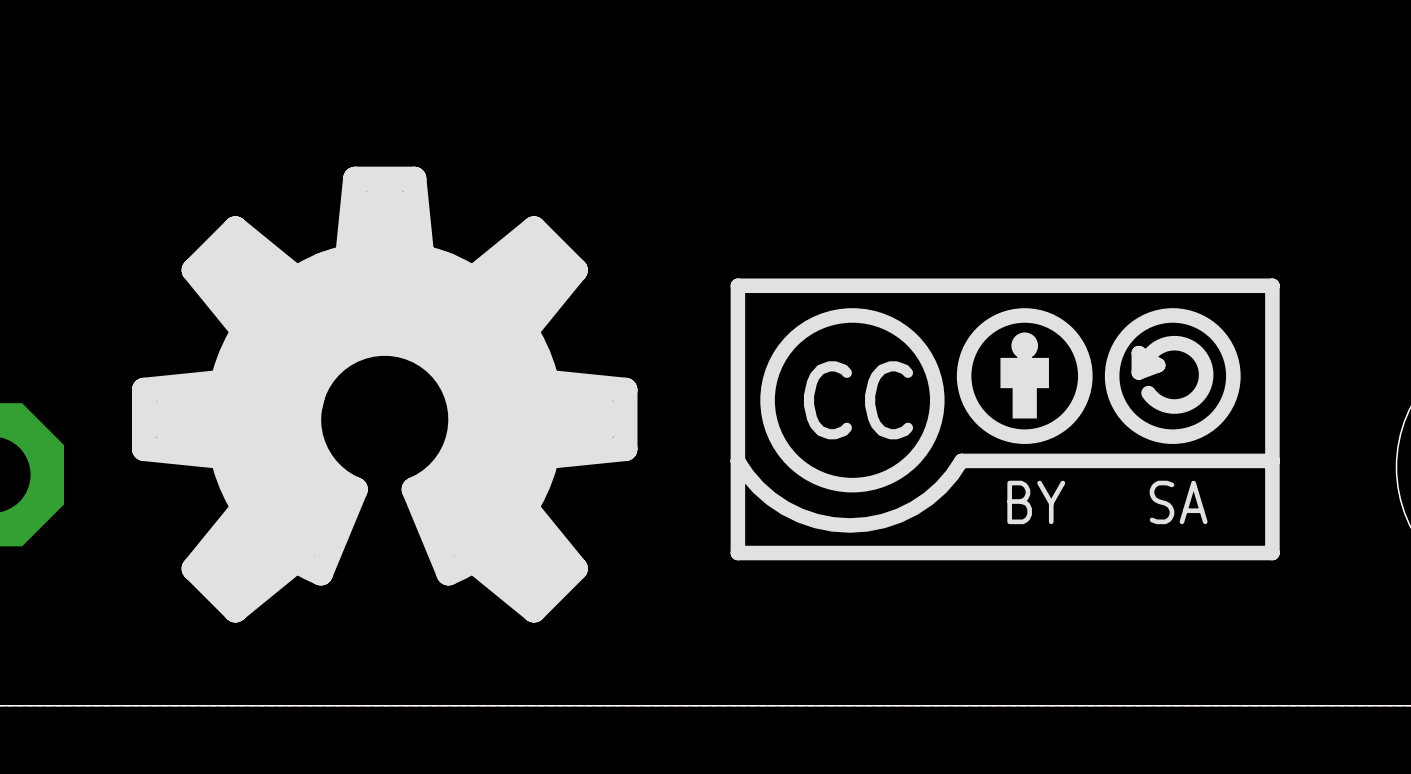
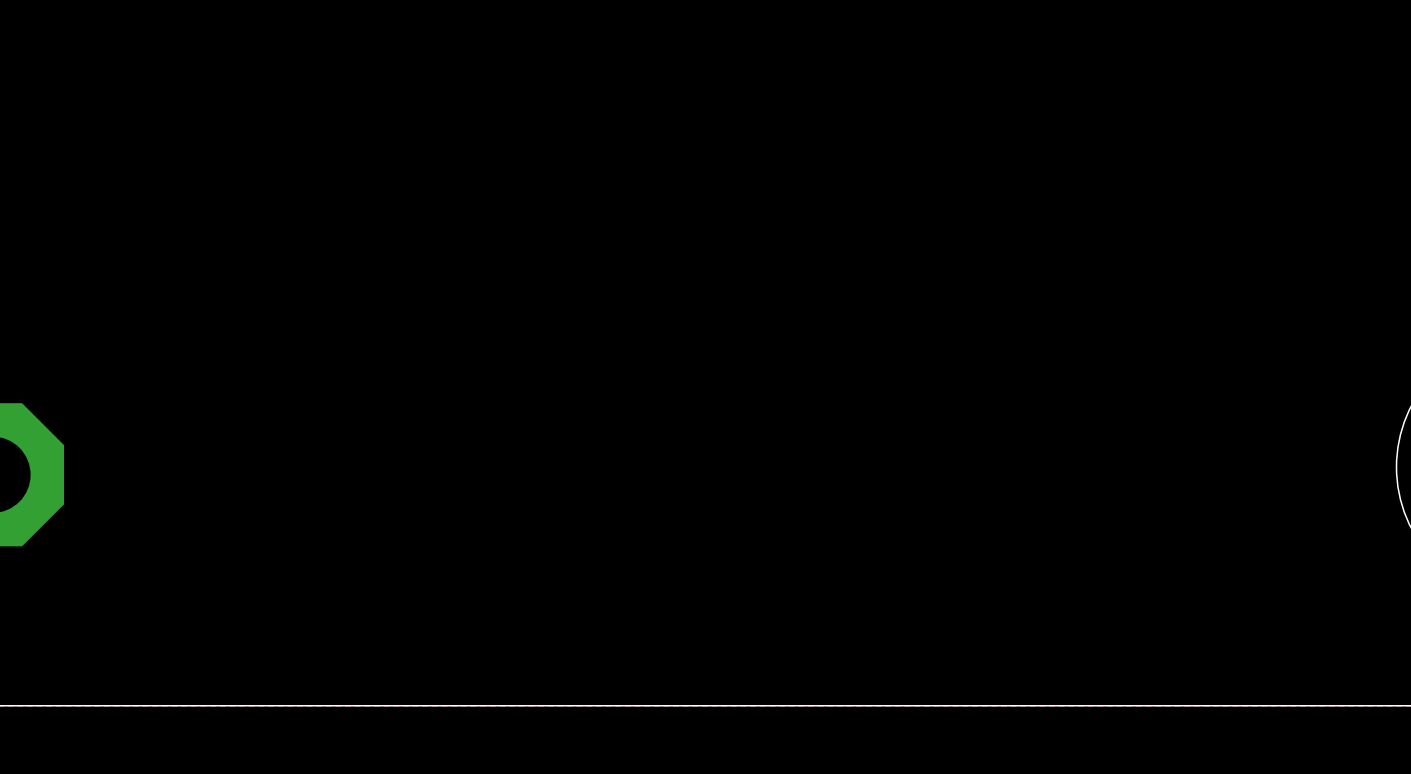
drawing: [131, 166, 1280, 623] -> none

